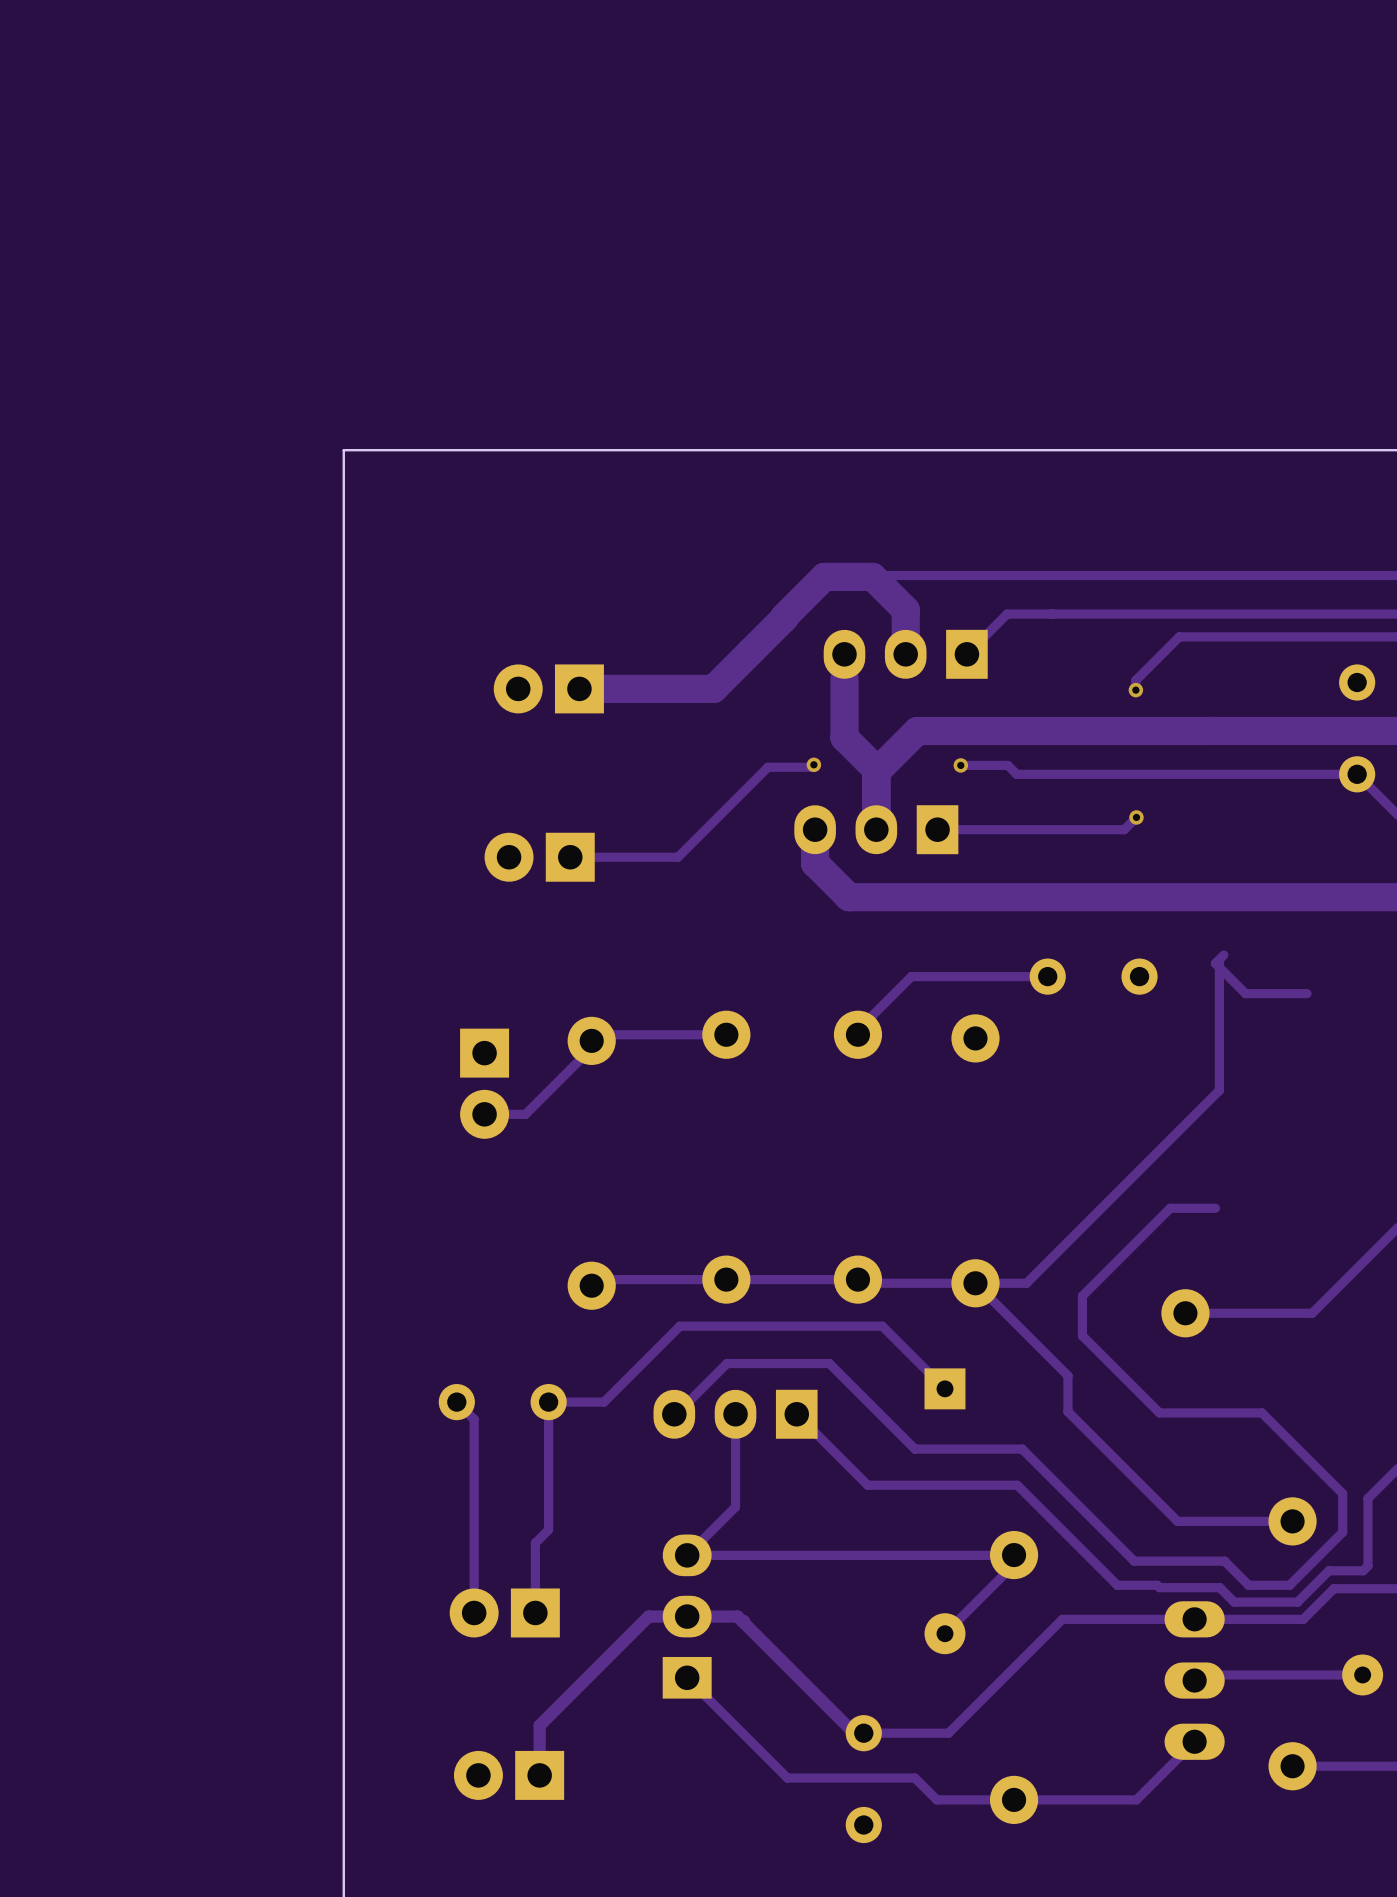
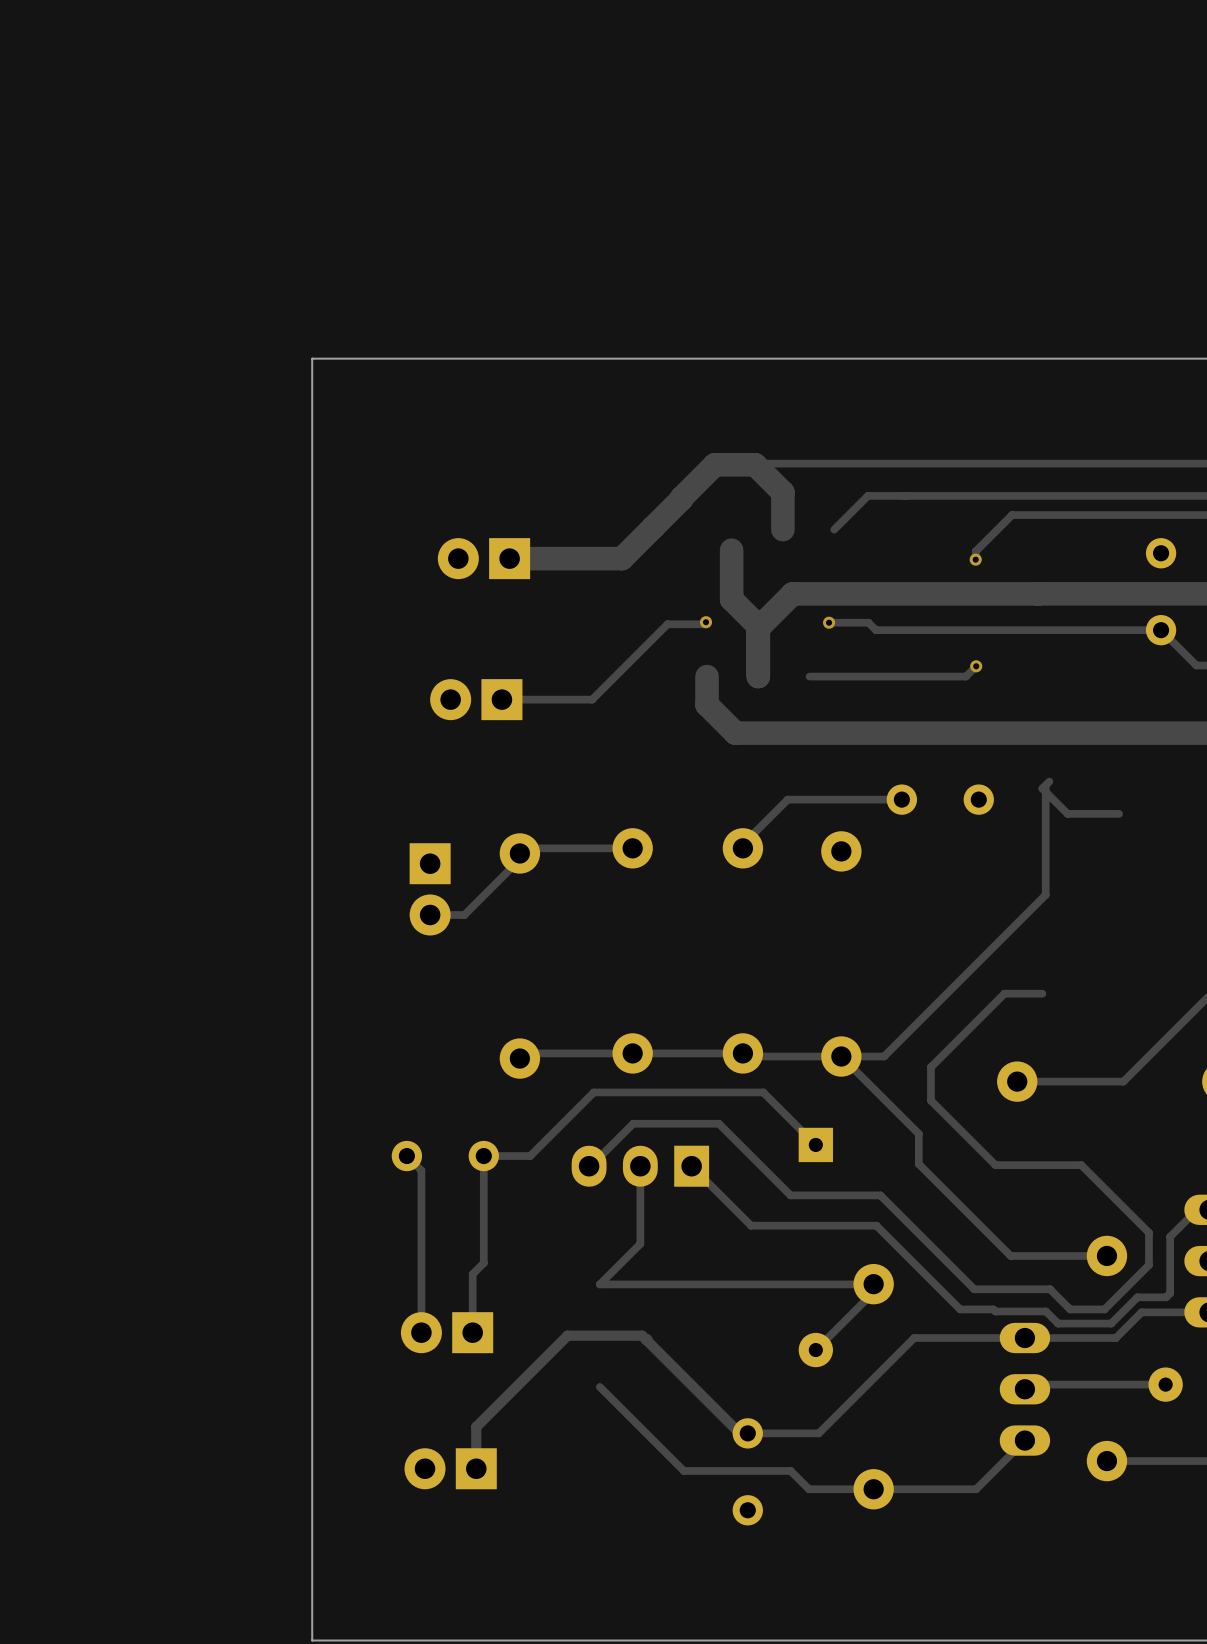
part: (905, 654) -> none
part: (876, 829) -> none
part: (687, 1616) -> none

